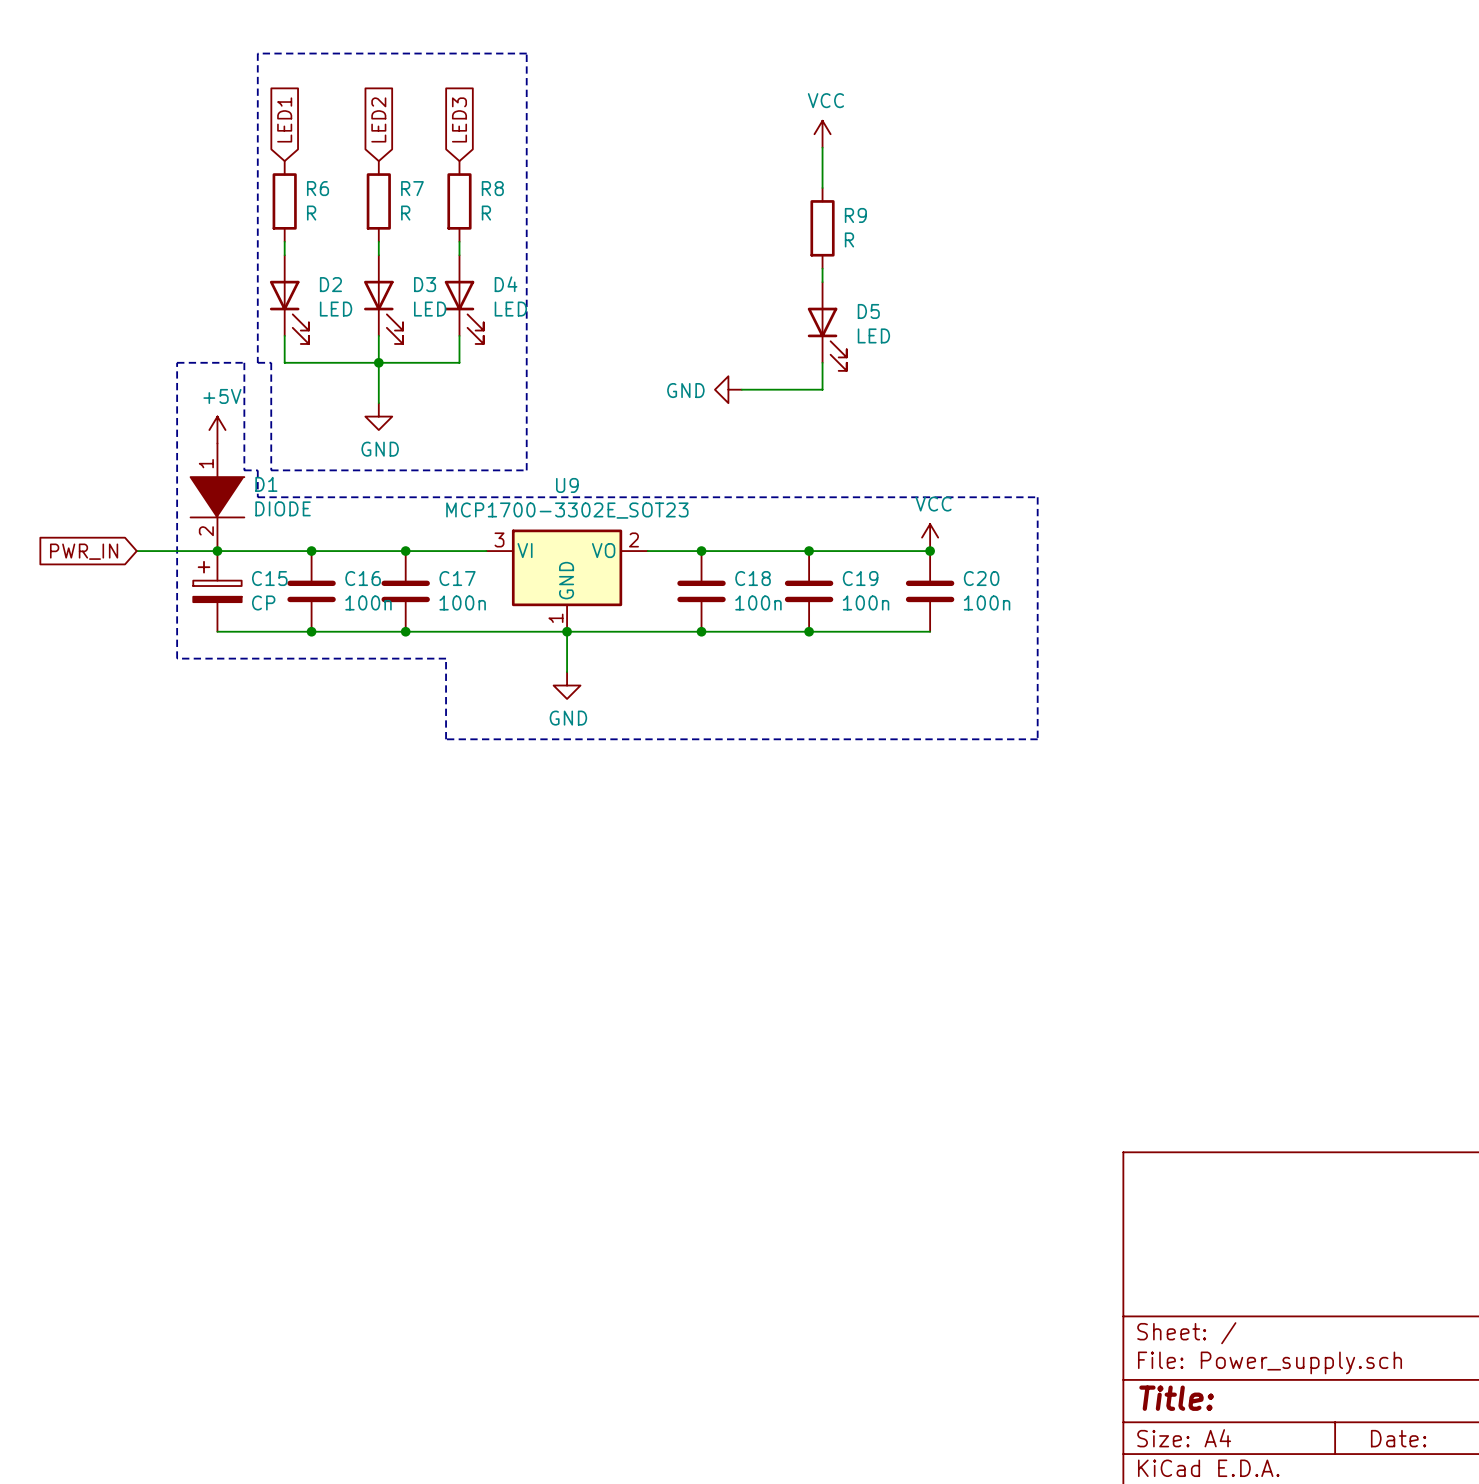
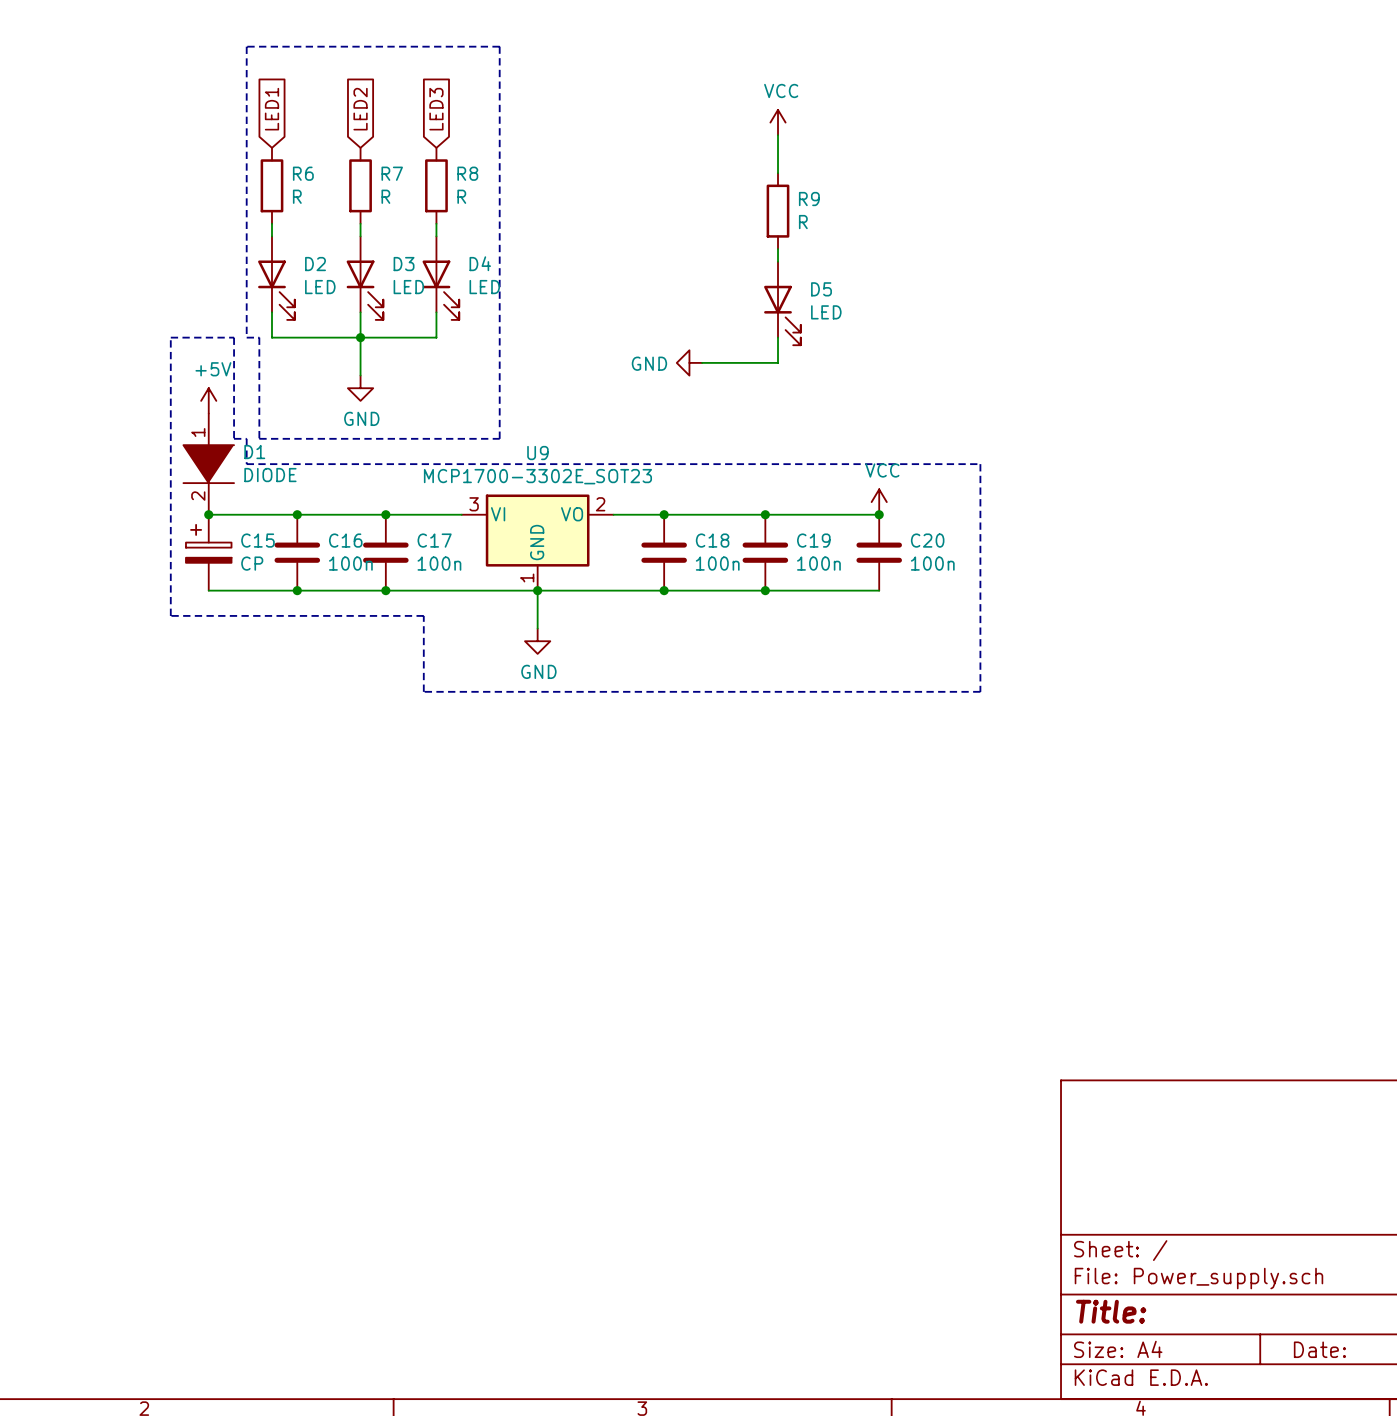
global label: PWR_IN (84, 551) -> none
wire: (136, 551) (217, 551) -> none

